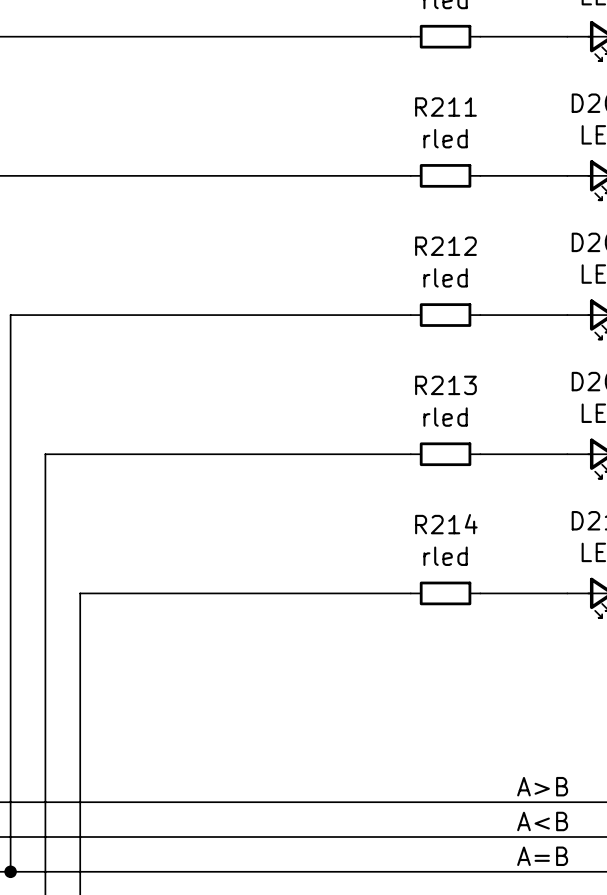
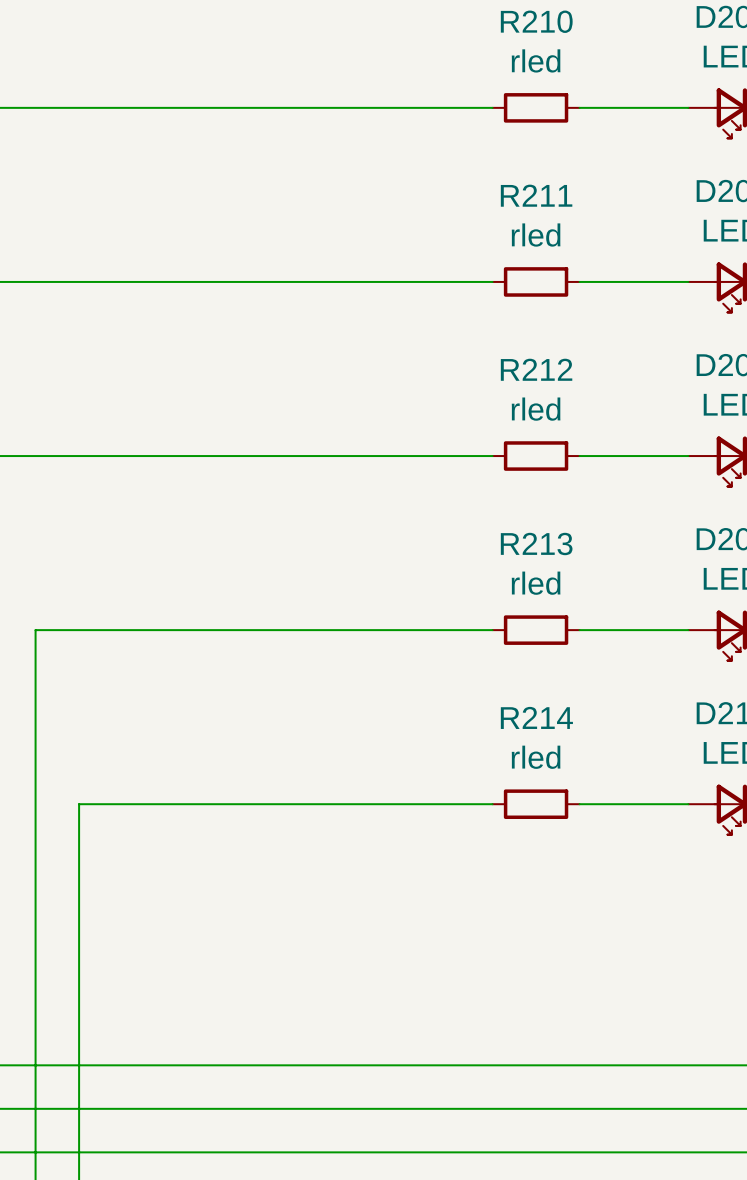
label: A>B (542, 786) -> none
label: A<B (542, 821) -> none
label: A=B (542, 856) -> none

